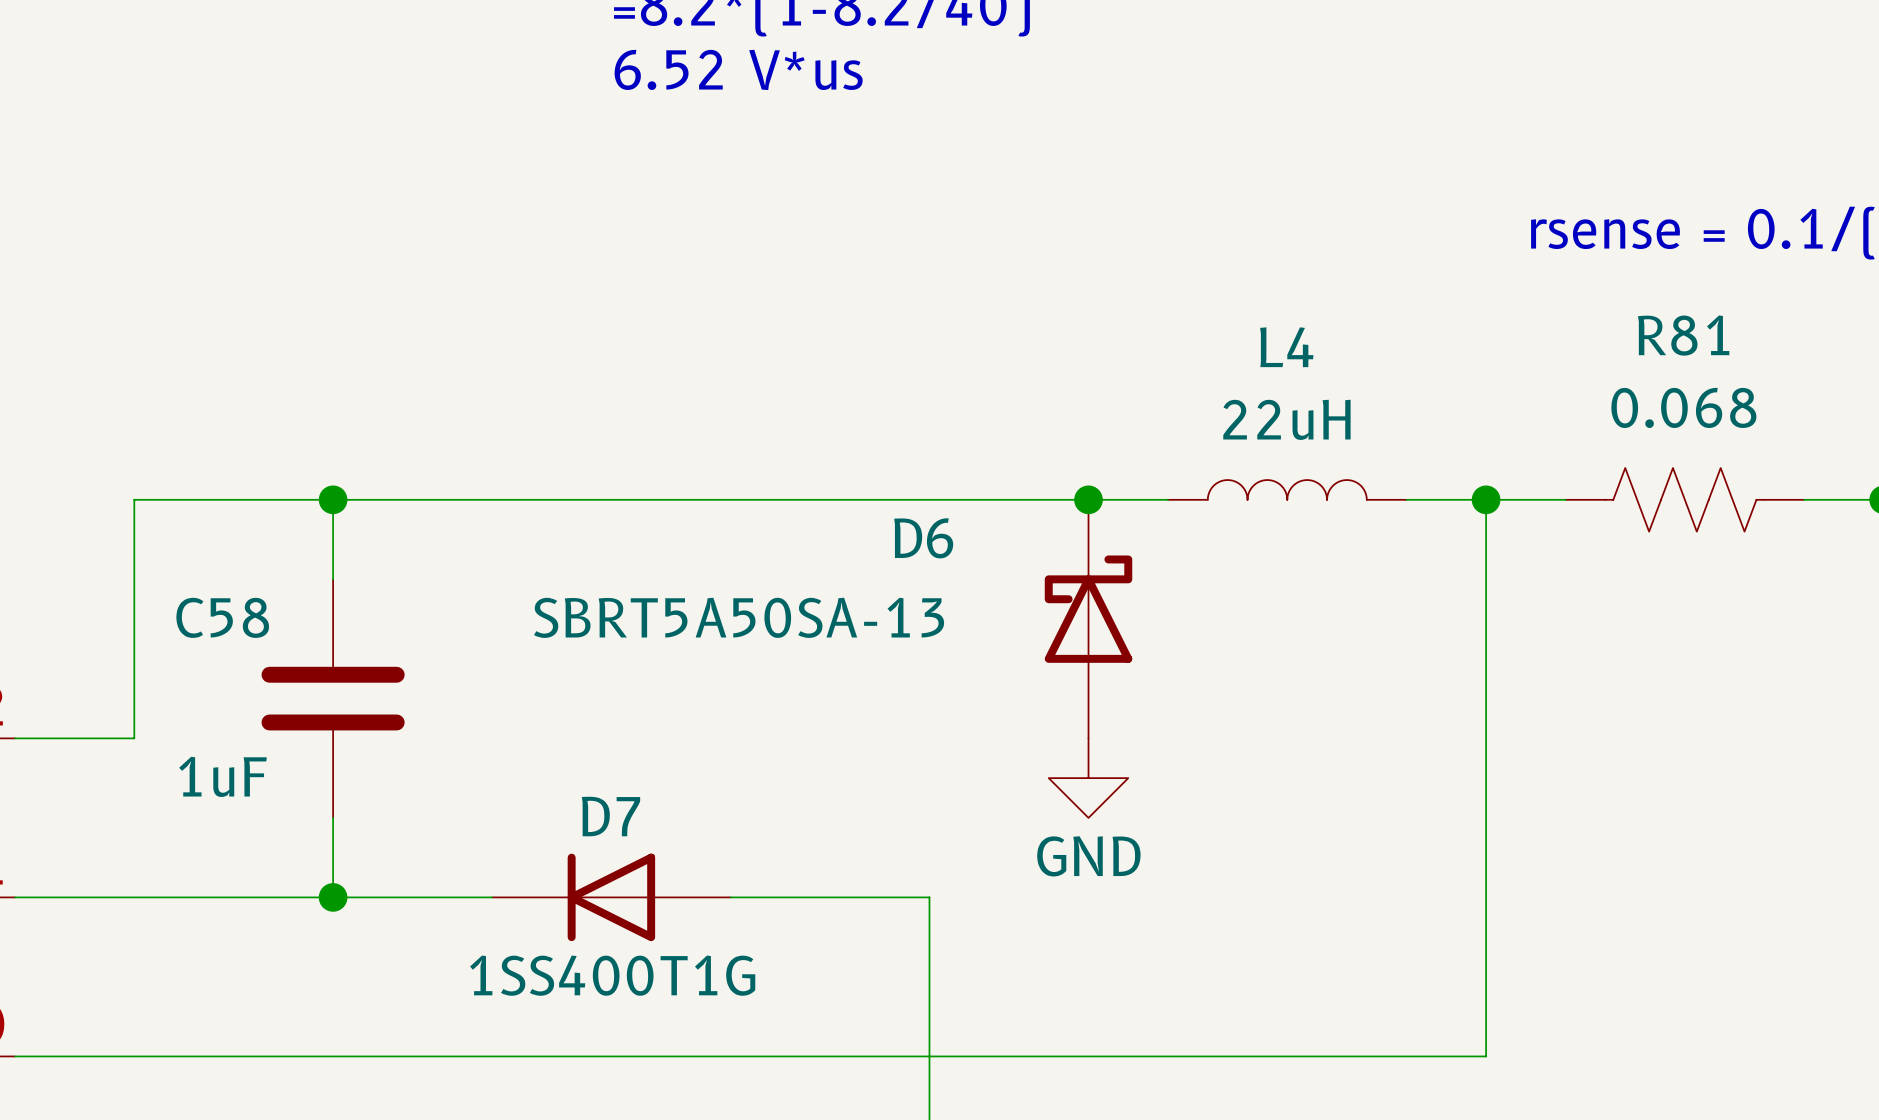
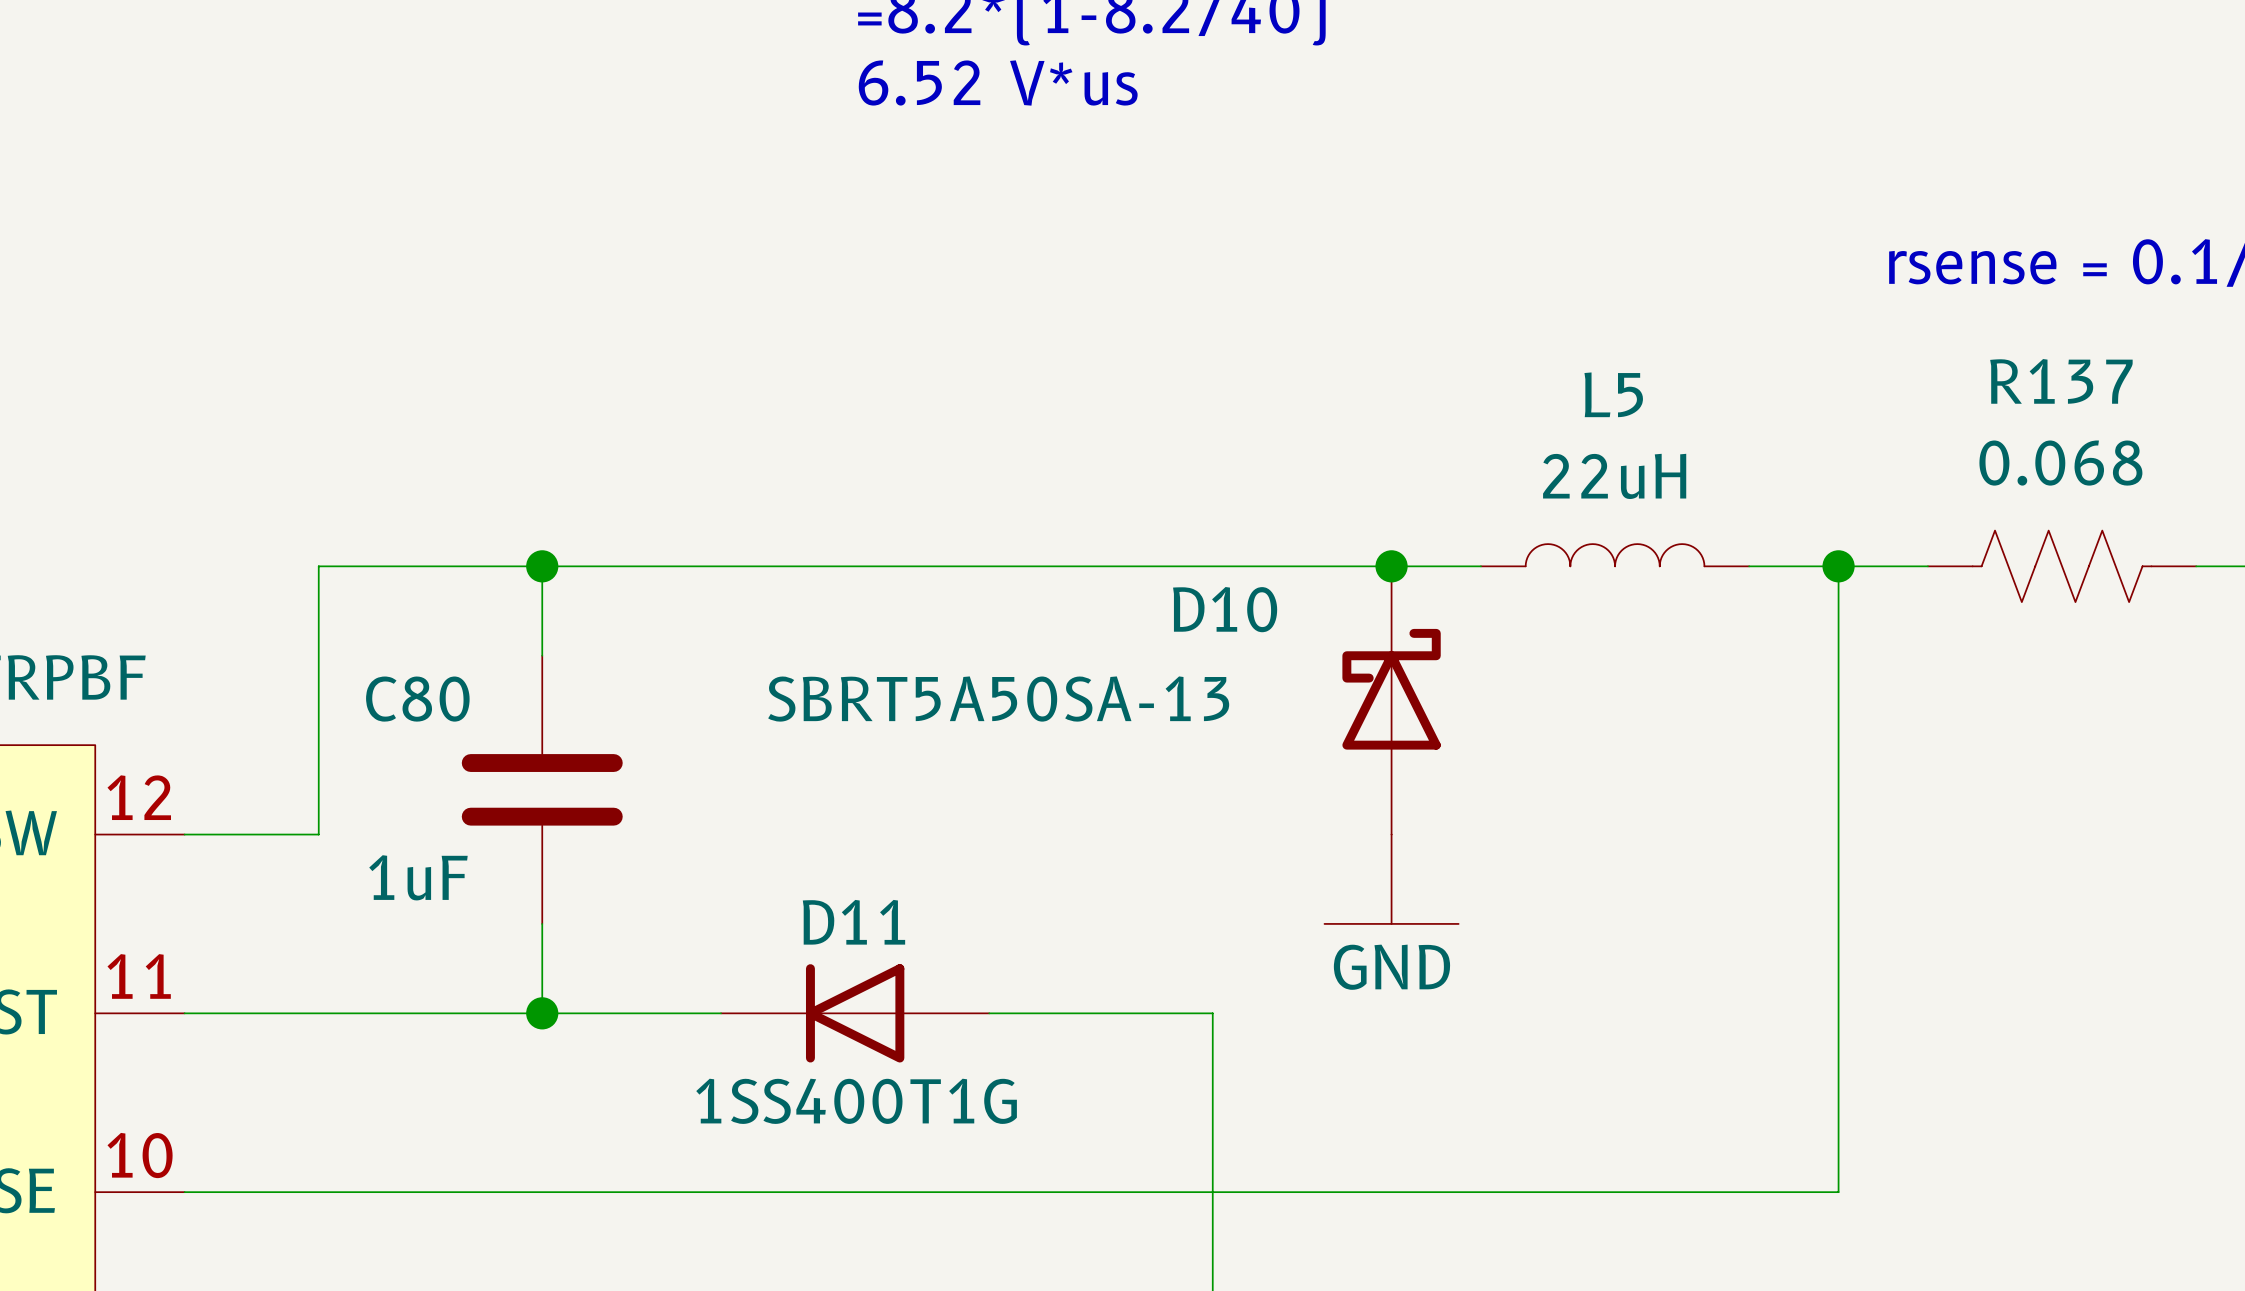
R81 name: R81 (1683, 335) -> R137 (2061, 381)
L4 name: L4 (1286, 347) -> L5 (1613, 394)
D6 name: D6 (923, 538) -> D10 (1225, 609)
C58 name: C58 (222, 617) -> C80 (417, 699)
power symbol shape: [1048, 738, 1129, 818] -> [1324, 834, 1459, 924]
D7 name: D7 (611, 816) -> D11 (853, 922)

